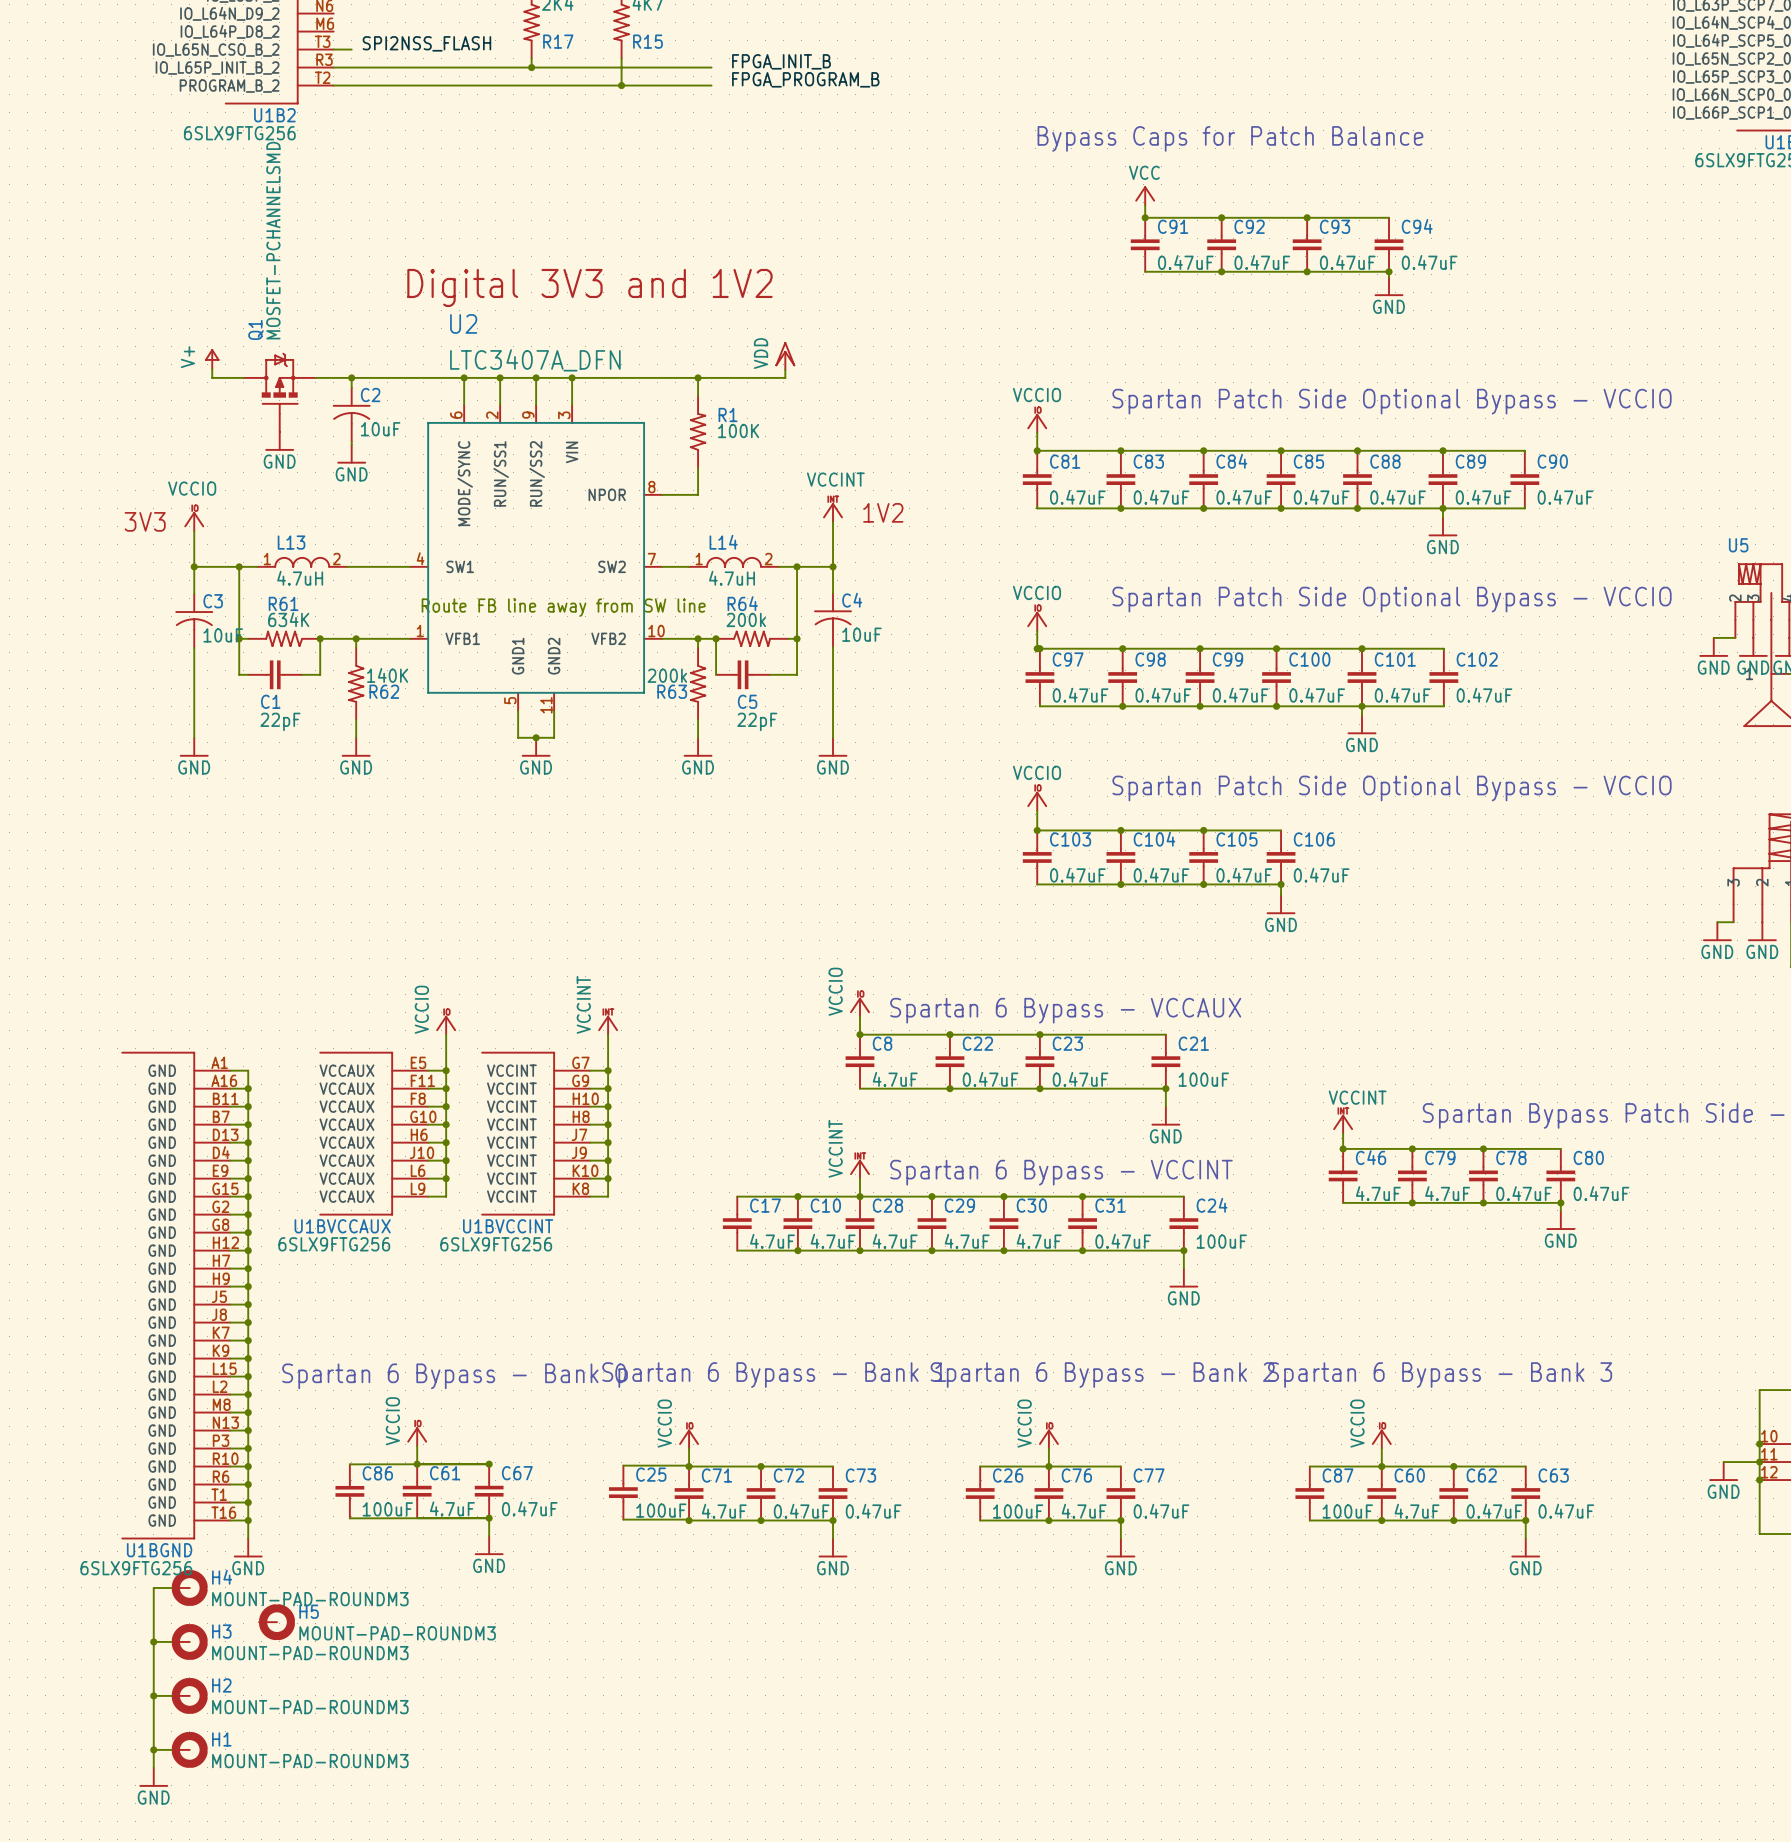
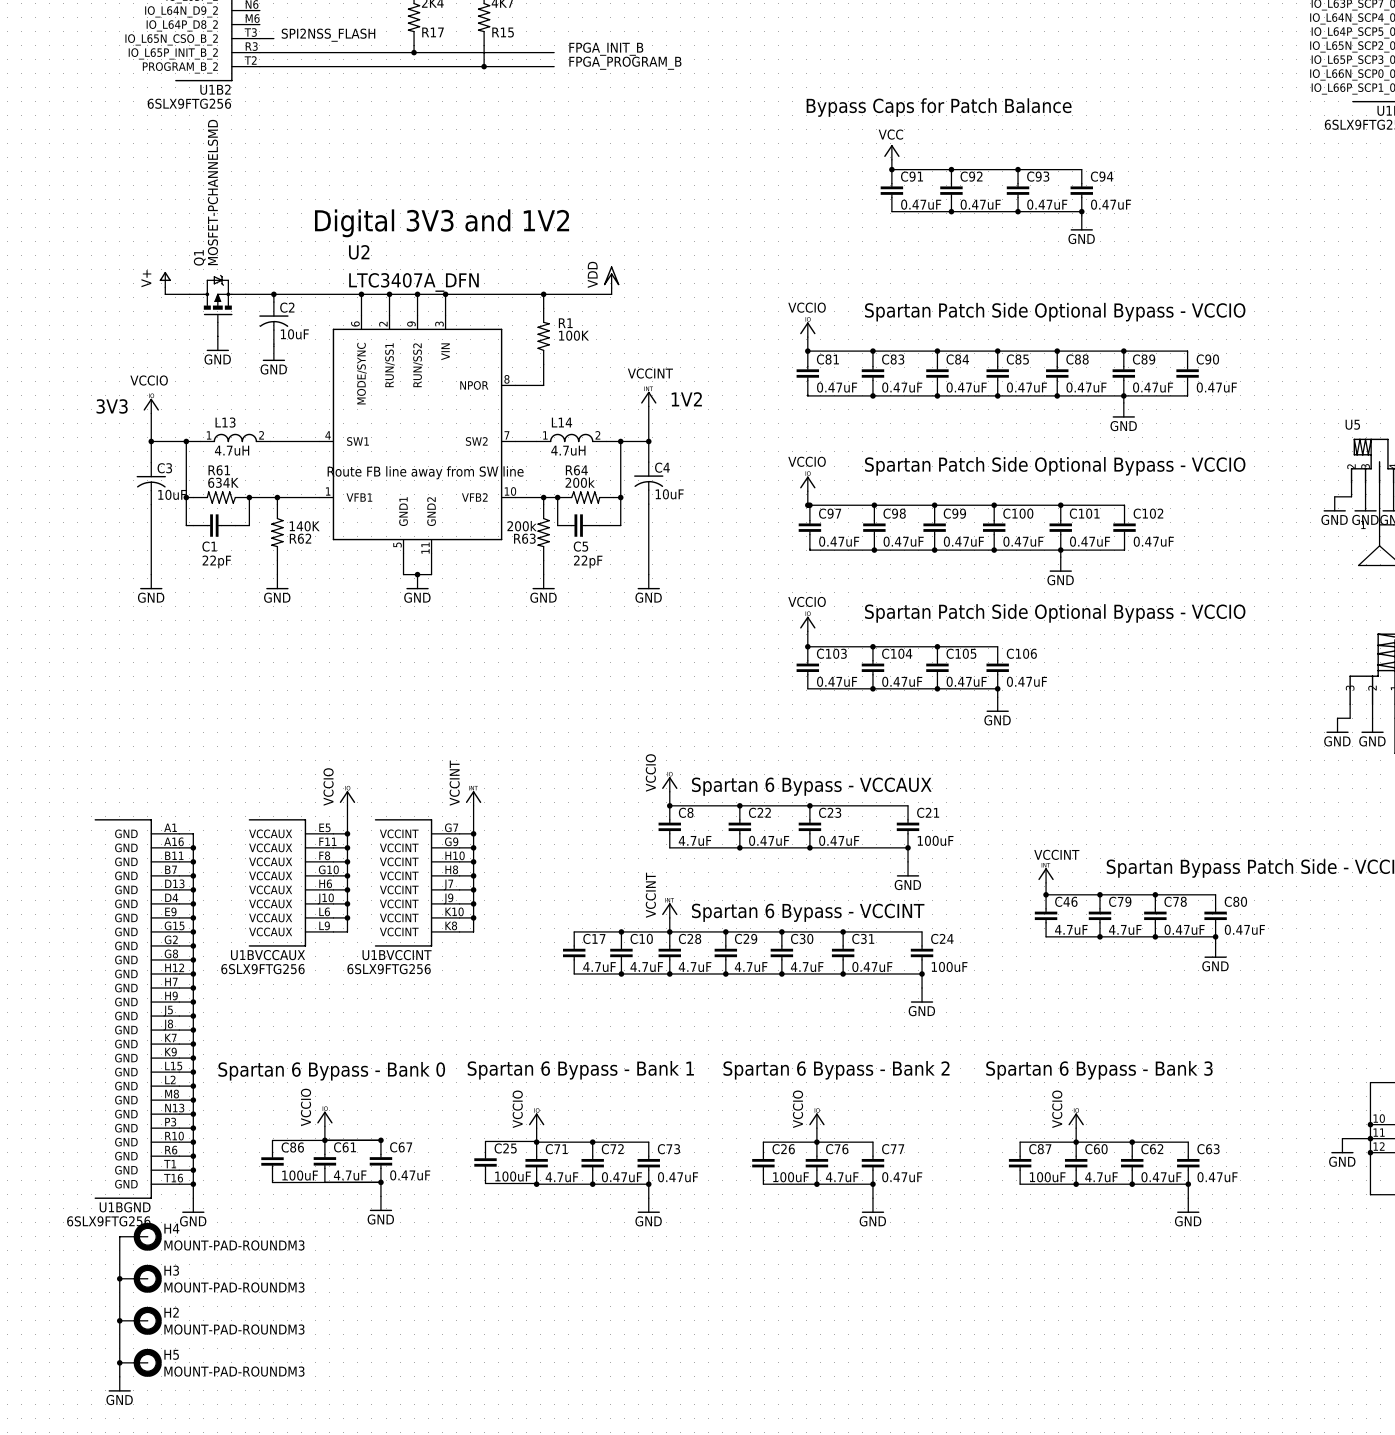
H5: MOUNT-PAD-ROUNDM3 (277, 1622) -> none
H1 name: H1 (221, 1739) -> H5 (171, 1354)

